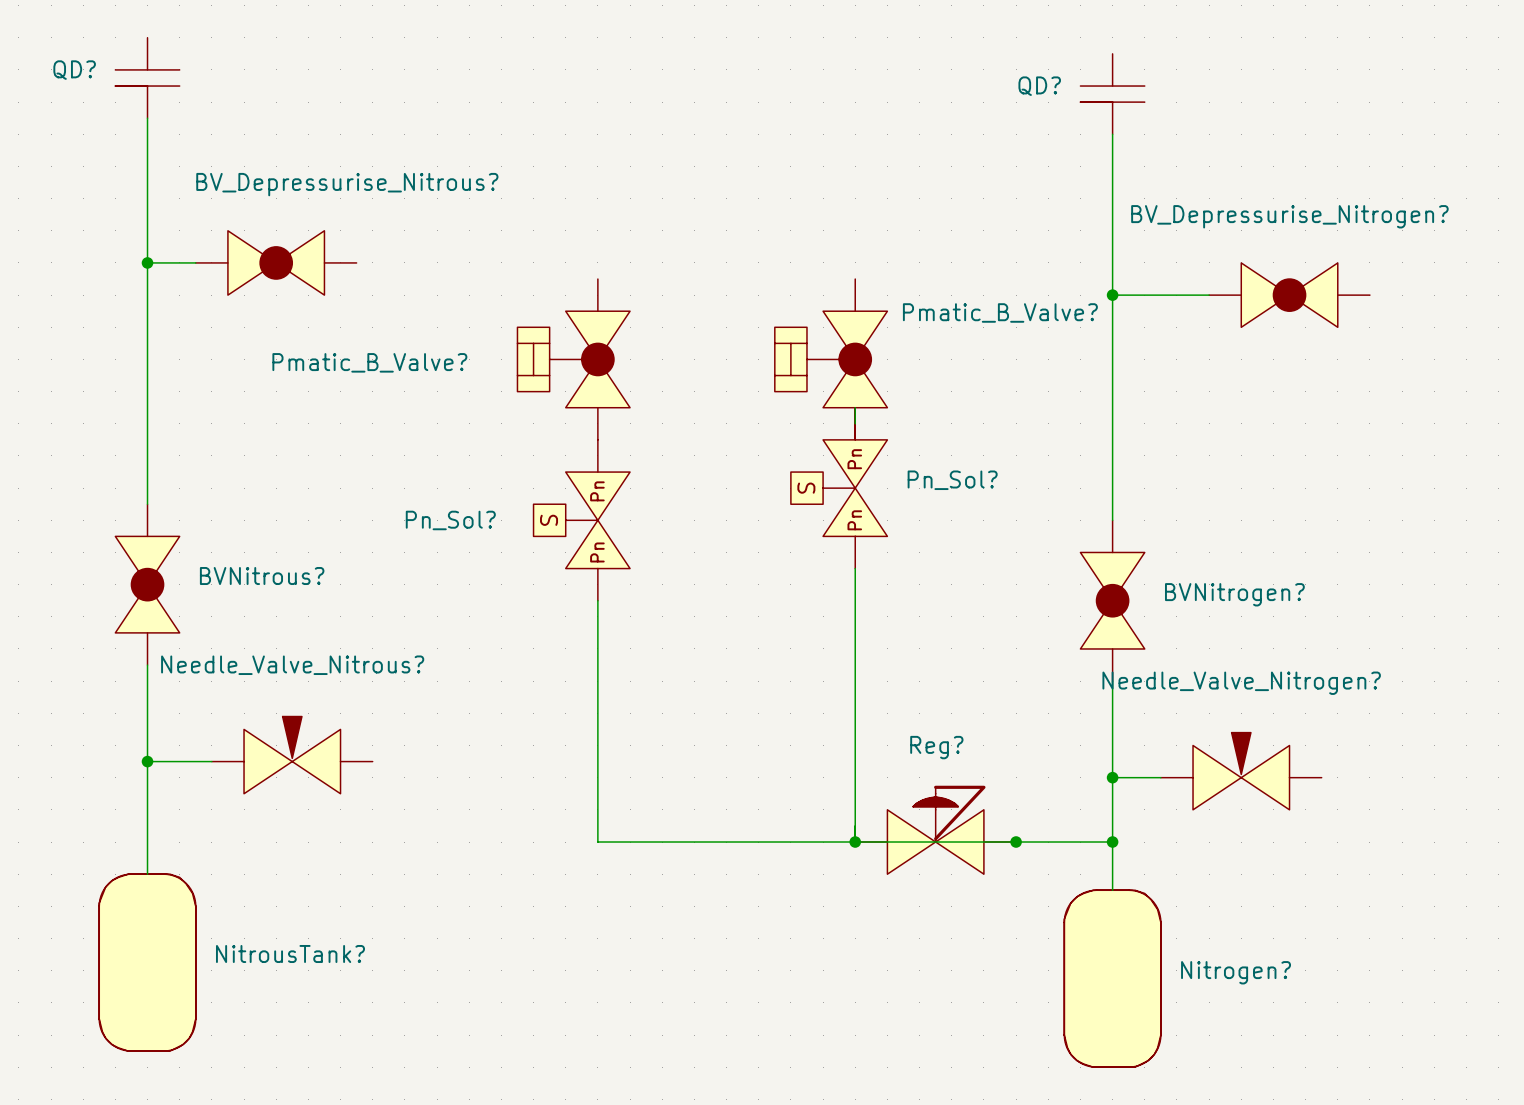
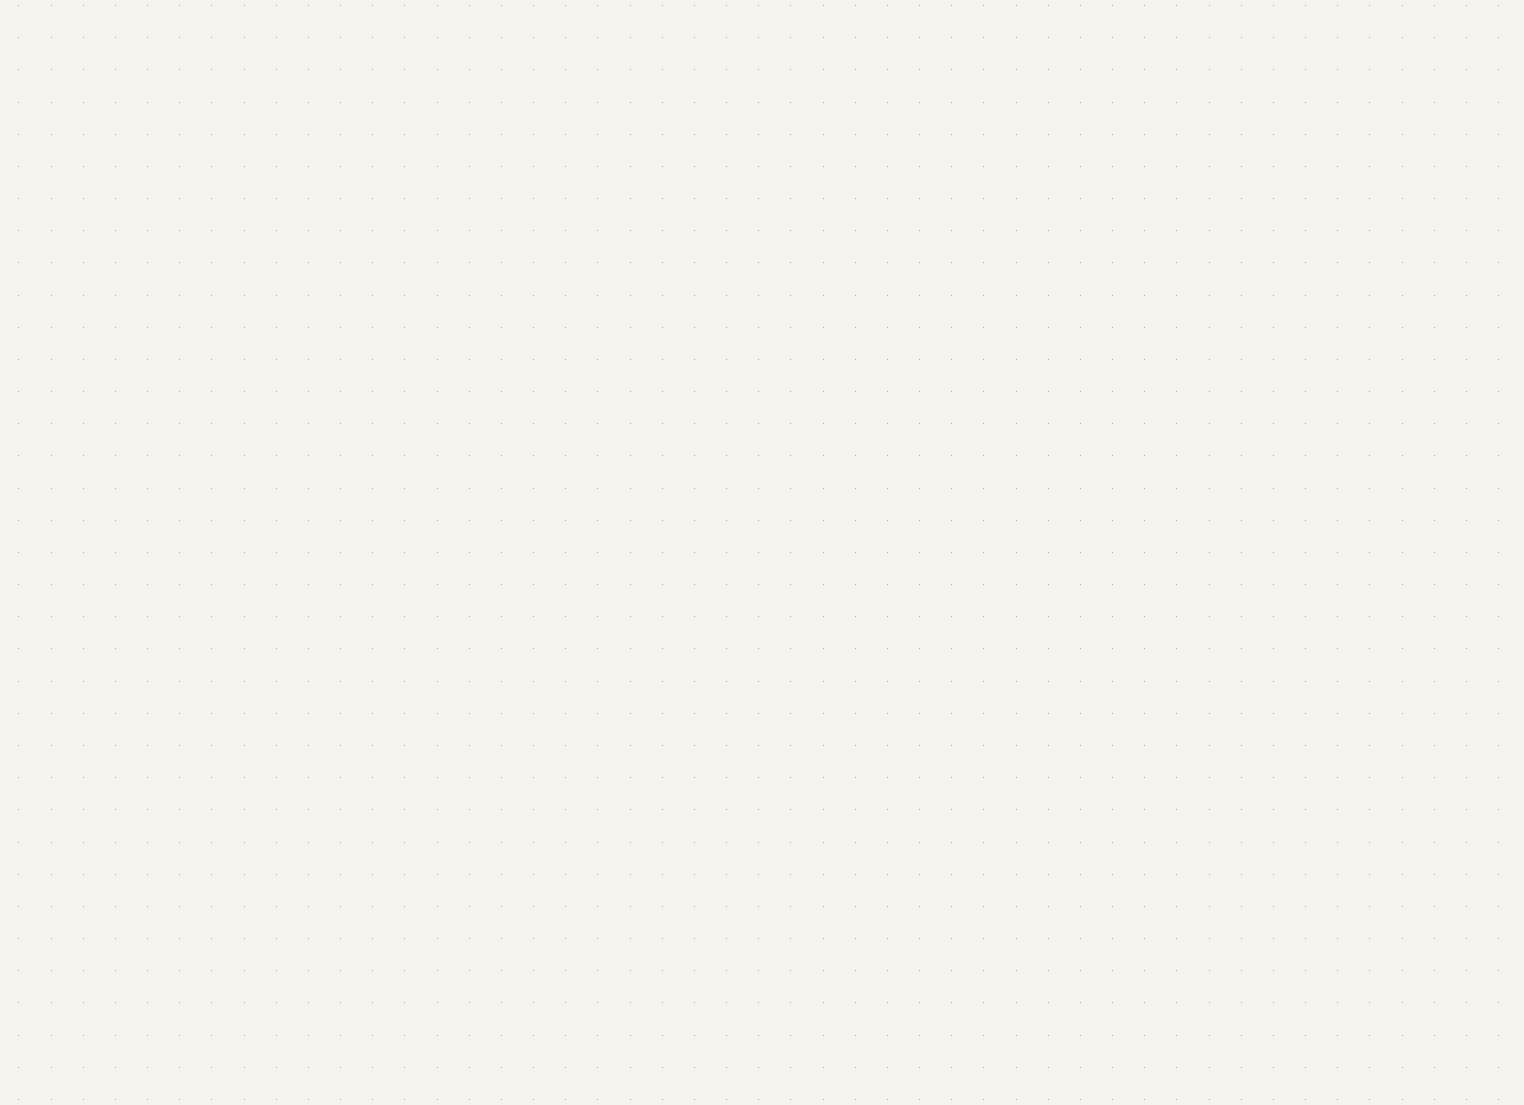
QD?: (147, 77) -> none
QD?: (1112, 94) -> none
wire: (147, 118) (147, 504) -> none
wire: (1112, 134) (1112, 520) -> none
wire: (147, 262) (195, 262) -> none
junction: (147, 262) -> none
BV_Depressurise_Nitrous?: (276, 262) -> none
wire: (1112, 295) (1209, 295) -> none
junction: (1112, 295) -> none
BV_Depressurise_Nitrogen?: (1289, 295) -> none
Pmatic_B_Valve?: (573, 359) -> none
Pmatic_B_Valve?: (831, 359) -> none
wire: (855, 407) (855, 423) -> none
Pn_Sol?: (839, 488) -> none
Pn_Sol?: (581, 520) -> none
wire: (855, 568) (855, 842) -> none
BVNitrous?: (147, 584) -> none
wire: (597, 600) (597, 842) (1112, 842) -> none
BVNitrogen?: (1112, 600) -> none
wire: (147, 665) (147, 874) -> none
wire: (1112, 681) (1112, 890) -> none
Needle_Valve_Nitrous?: (292, 755) -> none
wire: (147, 761) (211, 761) -> none
junction: (147, 761) -> none
Needle_Valve_Nitrogen?: (1241, 771) -> none
wire: (1112, 777) (1160, 777) -> none
junction: (1112, 777) -> none
Reg?: (935, 829) -> none
junction: (855, 842) -> none
junction: (1016, 842) -> none
junction: (1112, 842) -> none
NitrousTank?: (147, 962) -> none
Nitrogen?: (1112, 978) -> none

